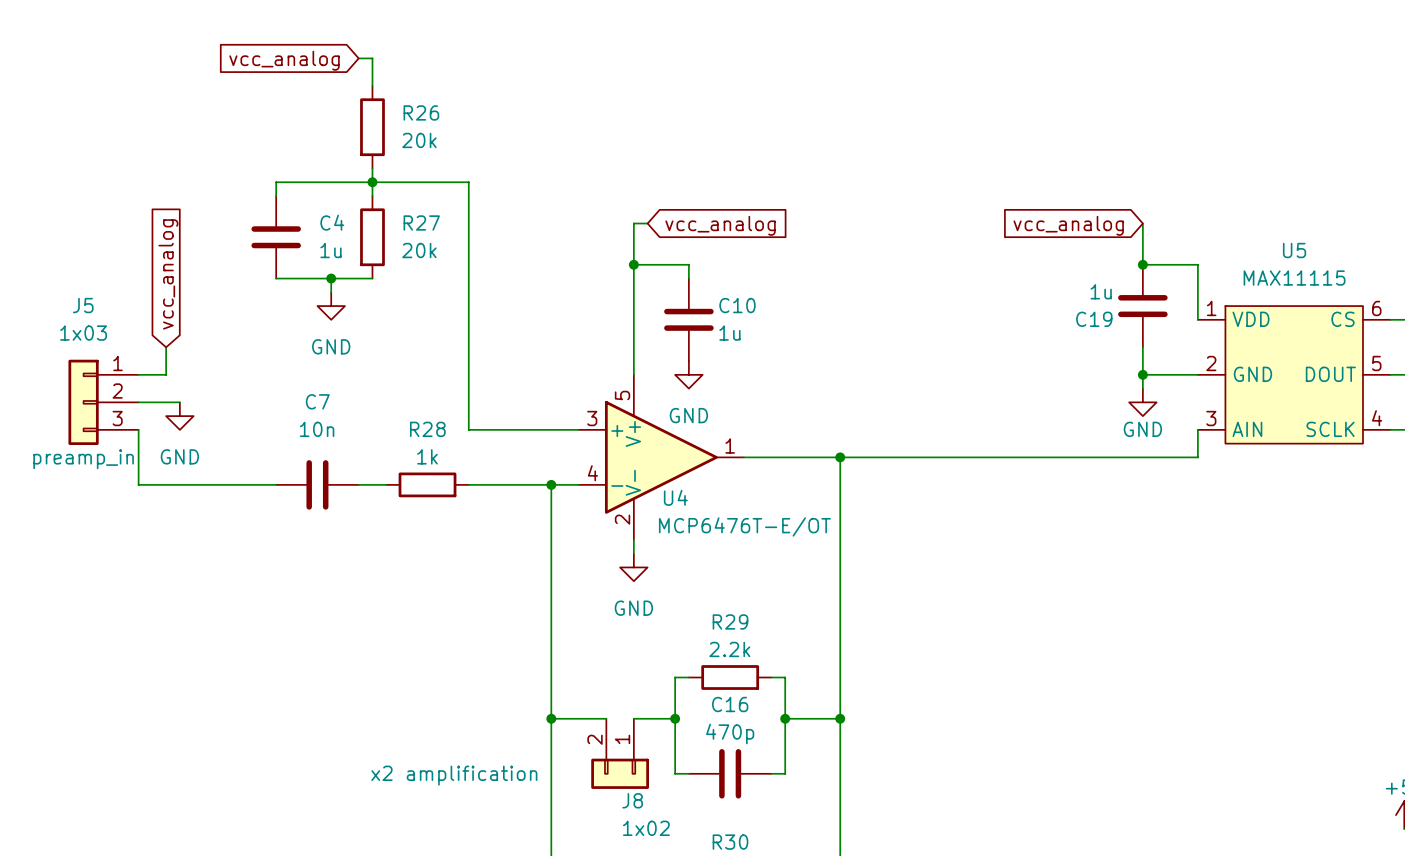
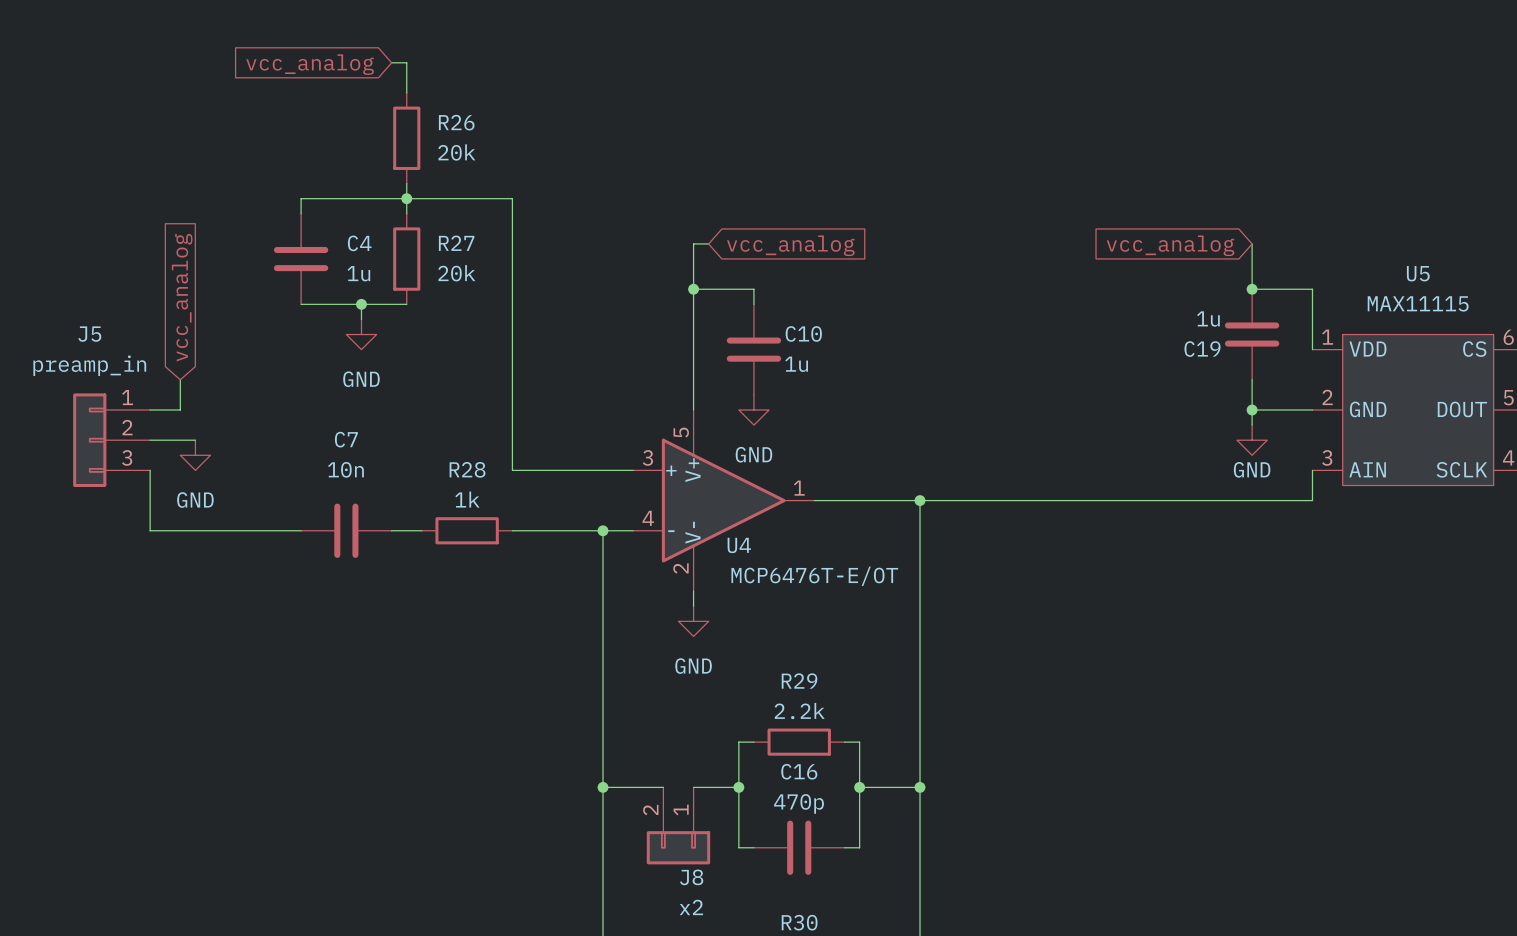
J5 value: 1x03 (83, 333) -> preamp_in (89, 365)
J5 text: preamp_in (83, 459) -> none
J8 text: x2 amplification (454, 775) -> none
J8 value: 1x02 (646, 828) -> x2 (691, 907)

